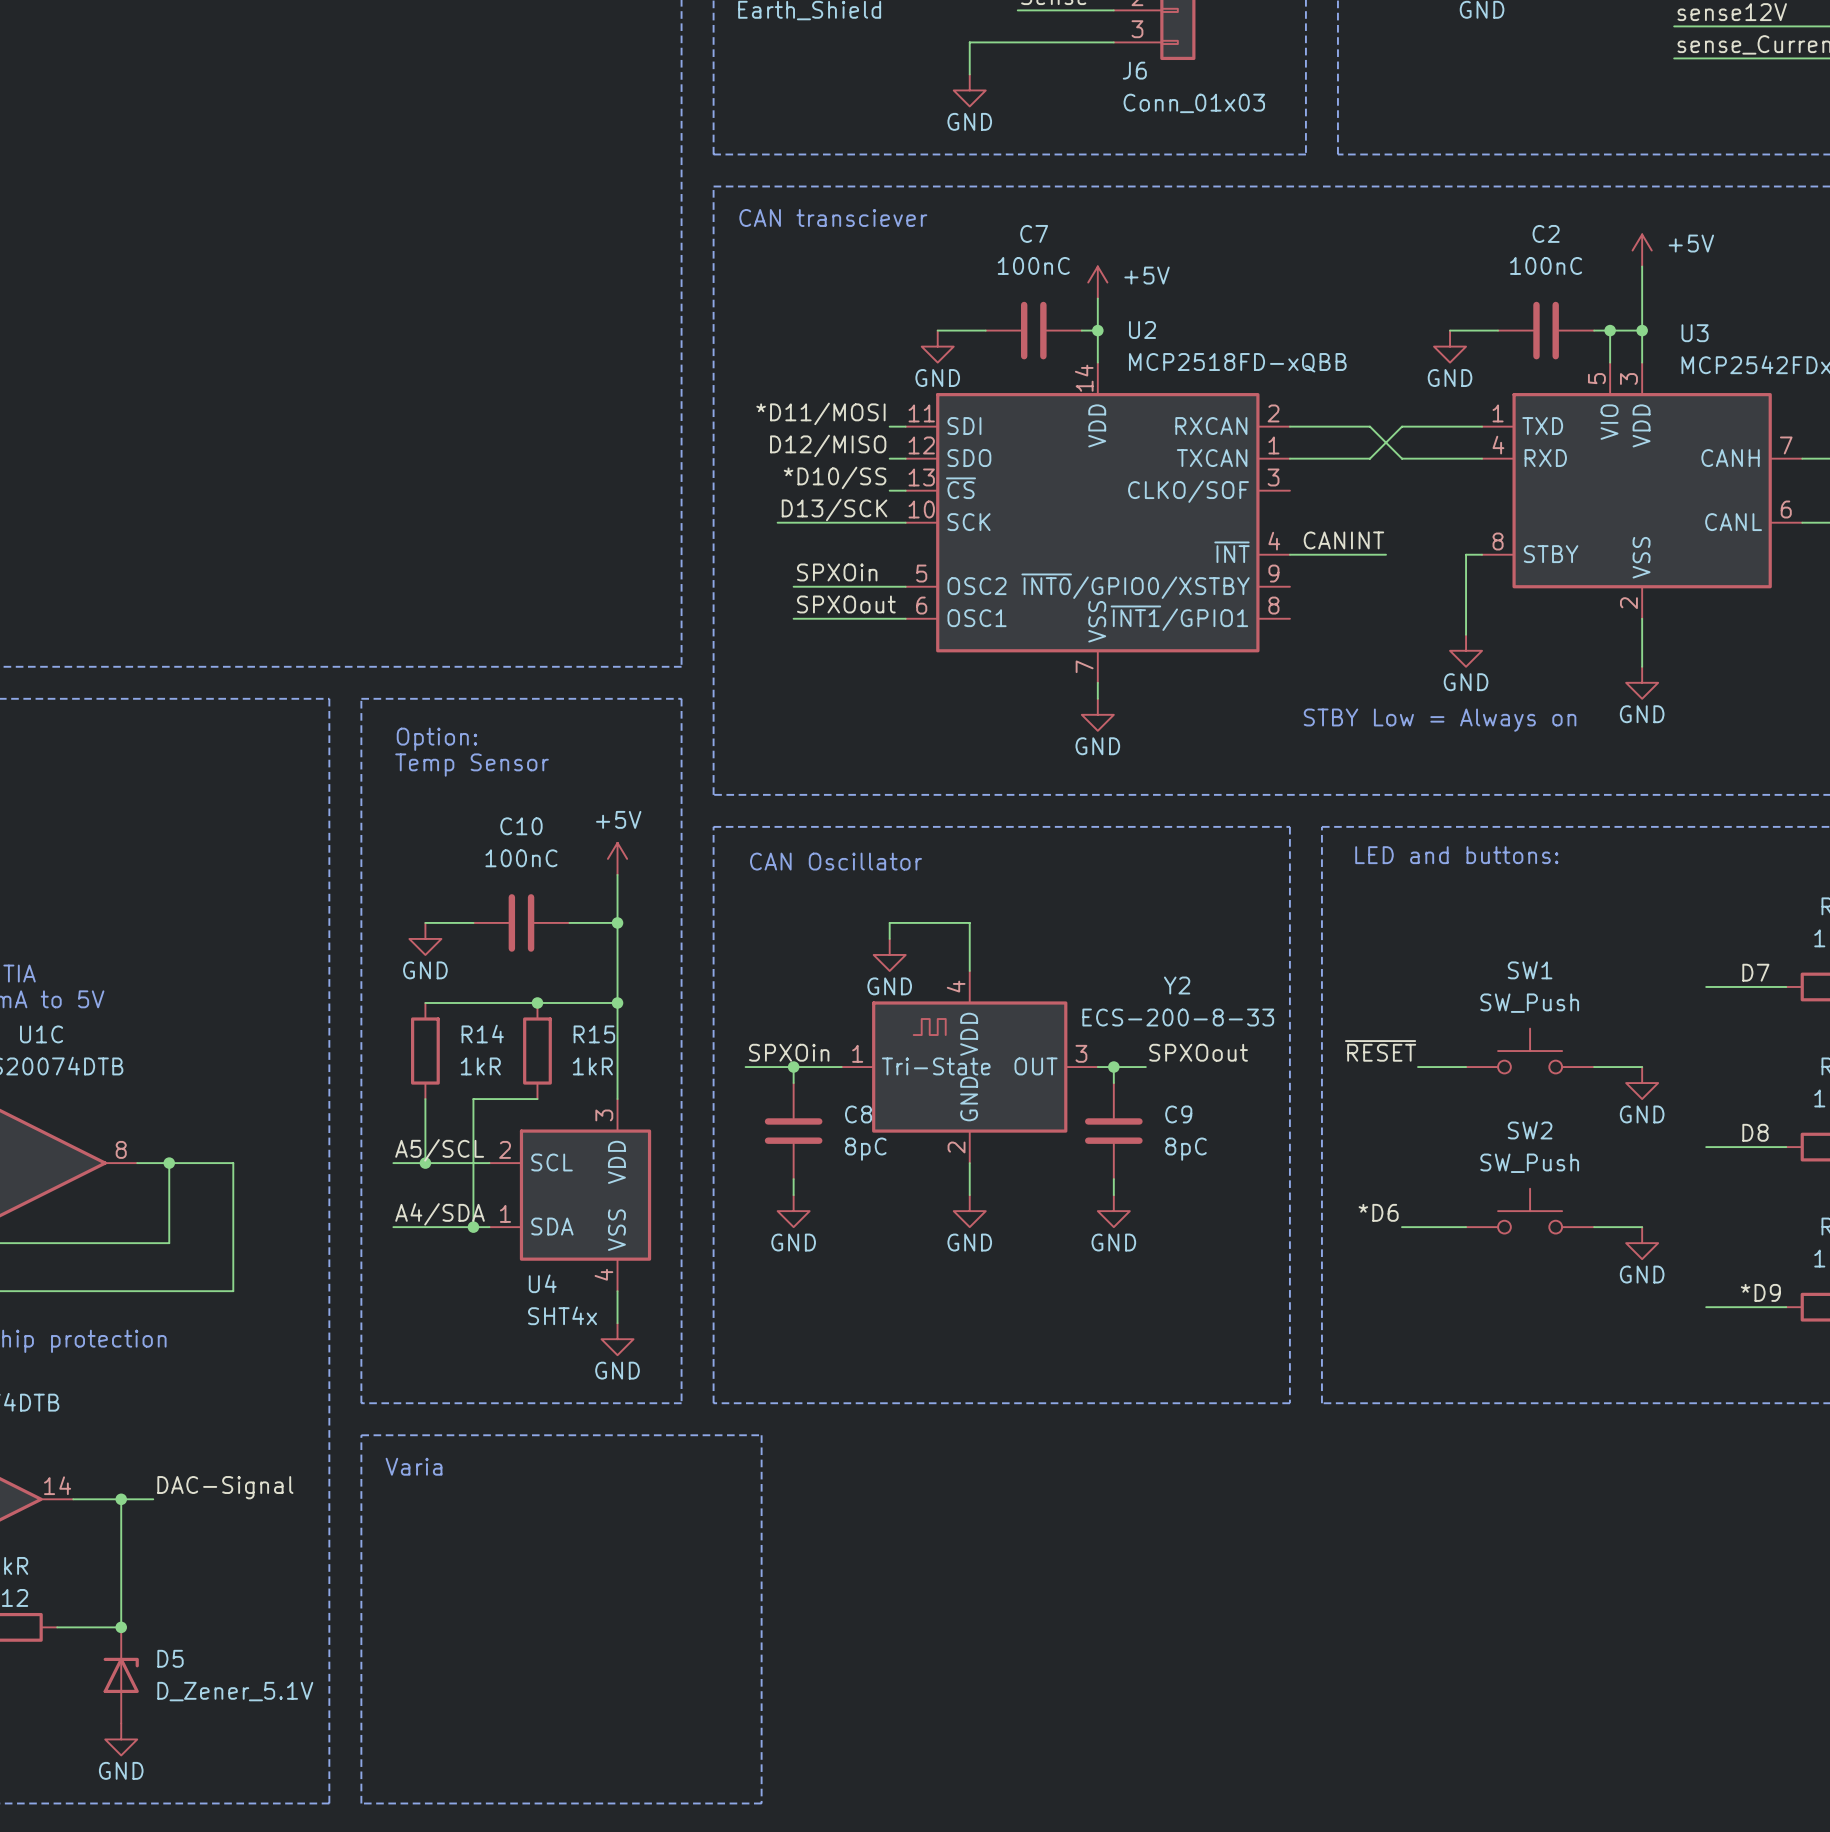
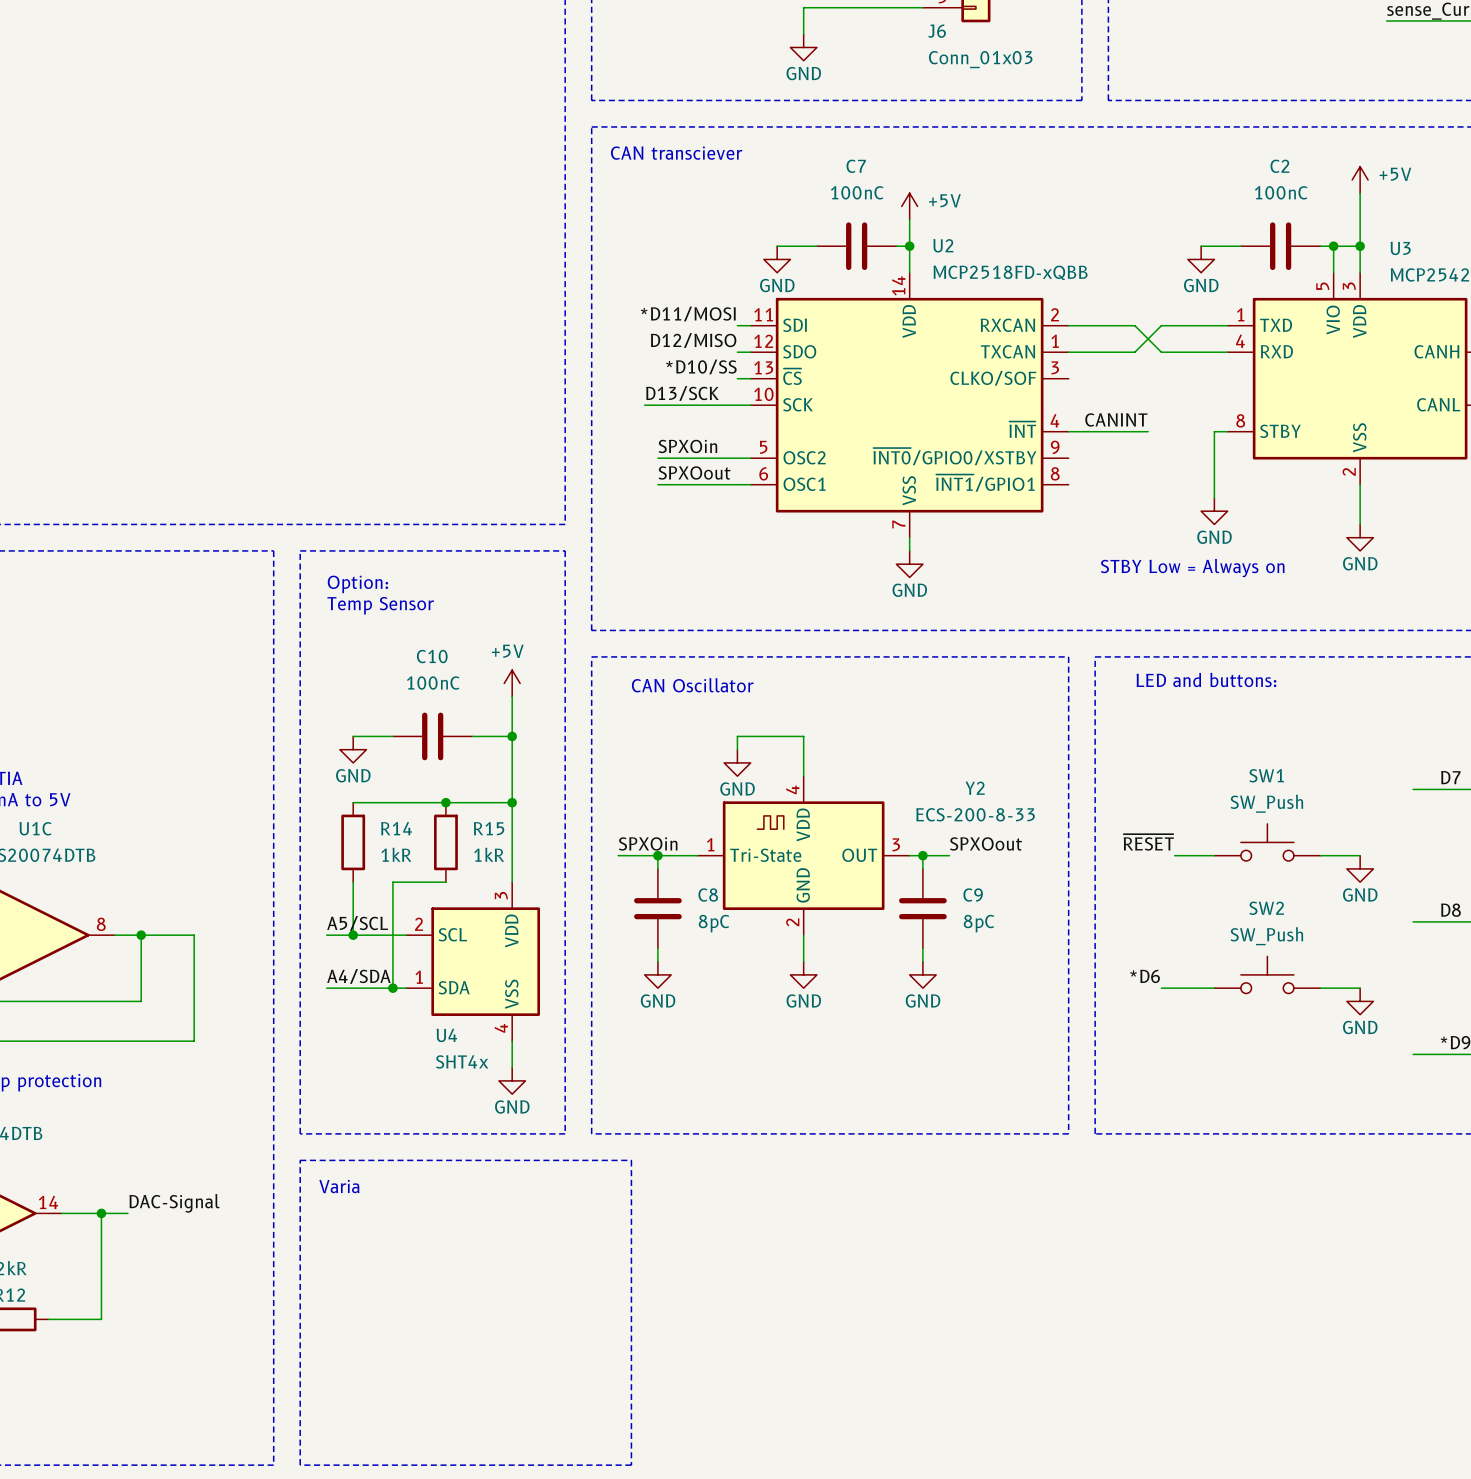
junction: (121, 1627) -> none
D5: D_Zener_5.1V (121, 1675) -> none
power symbol: GND (121, 1739) -> none

